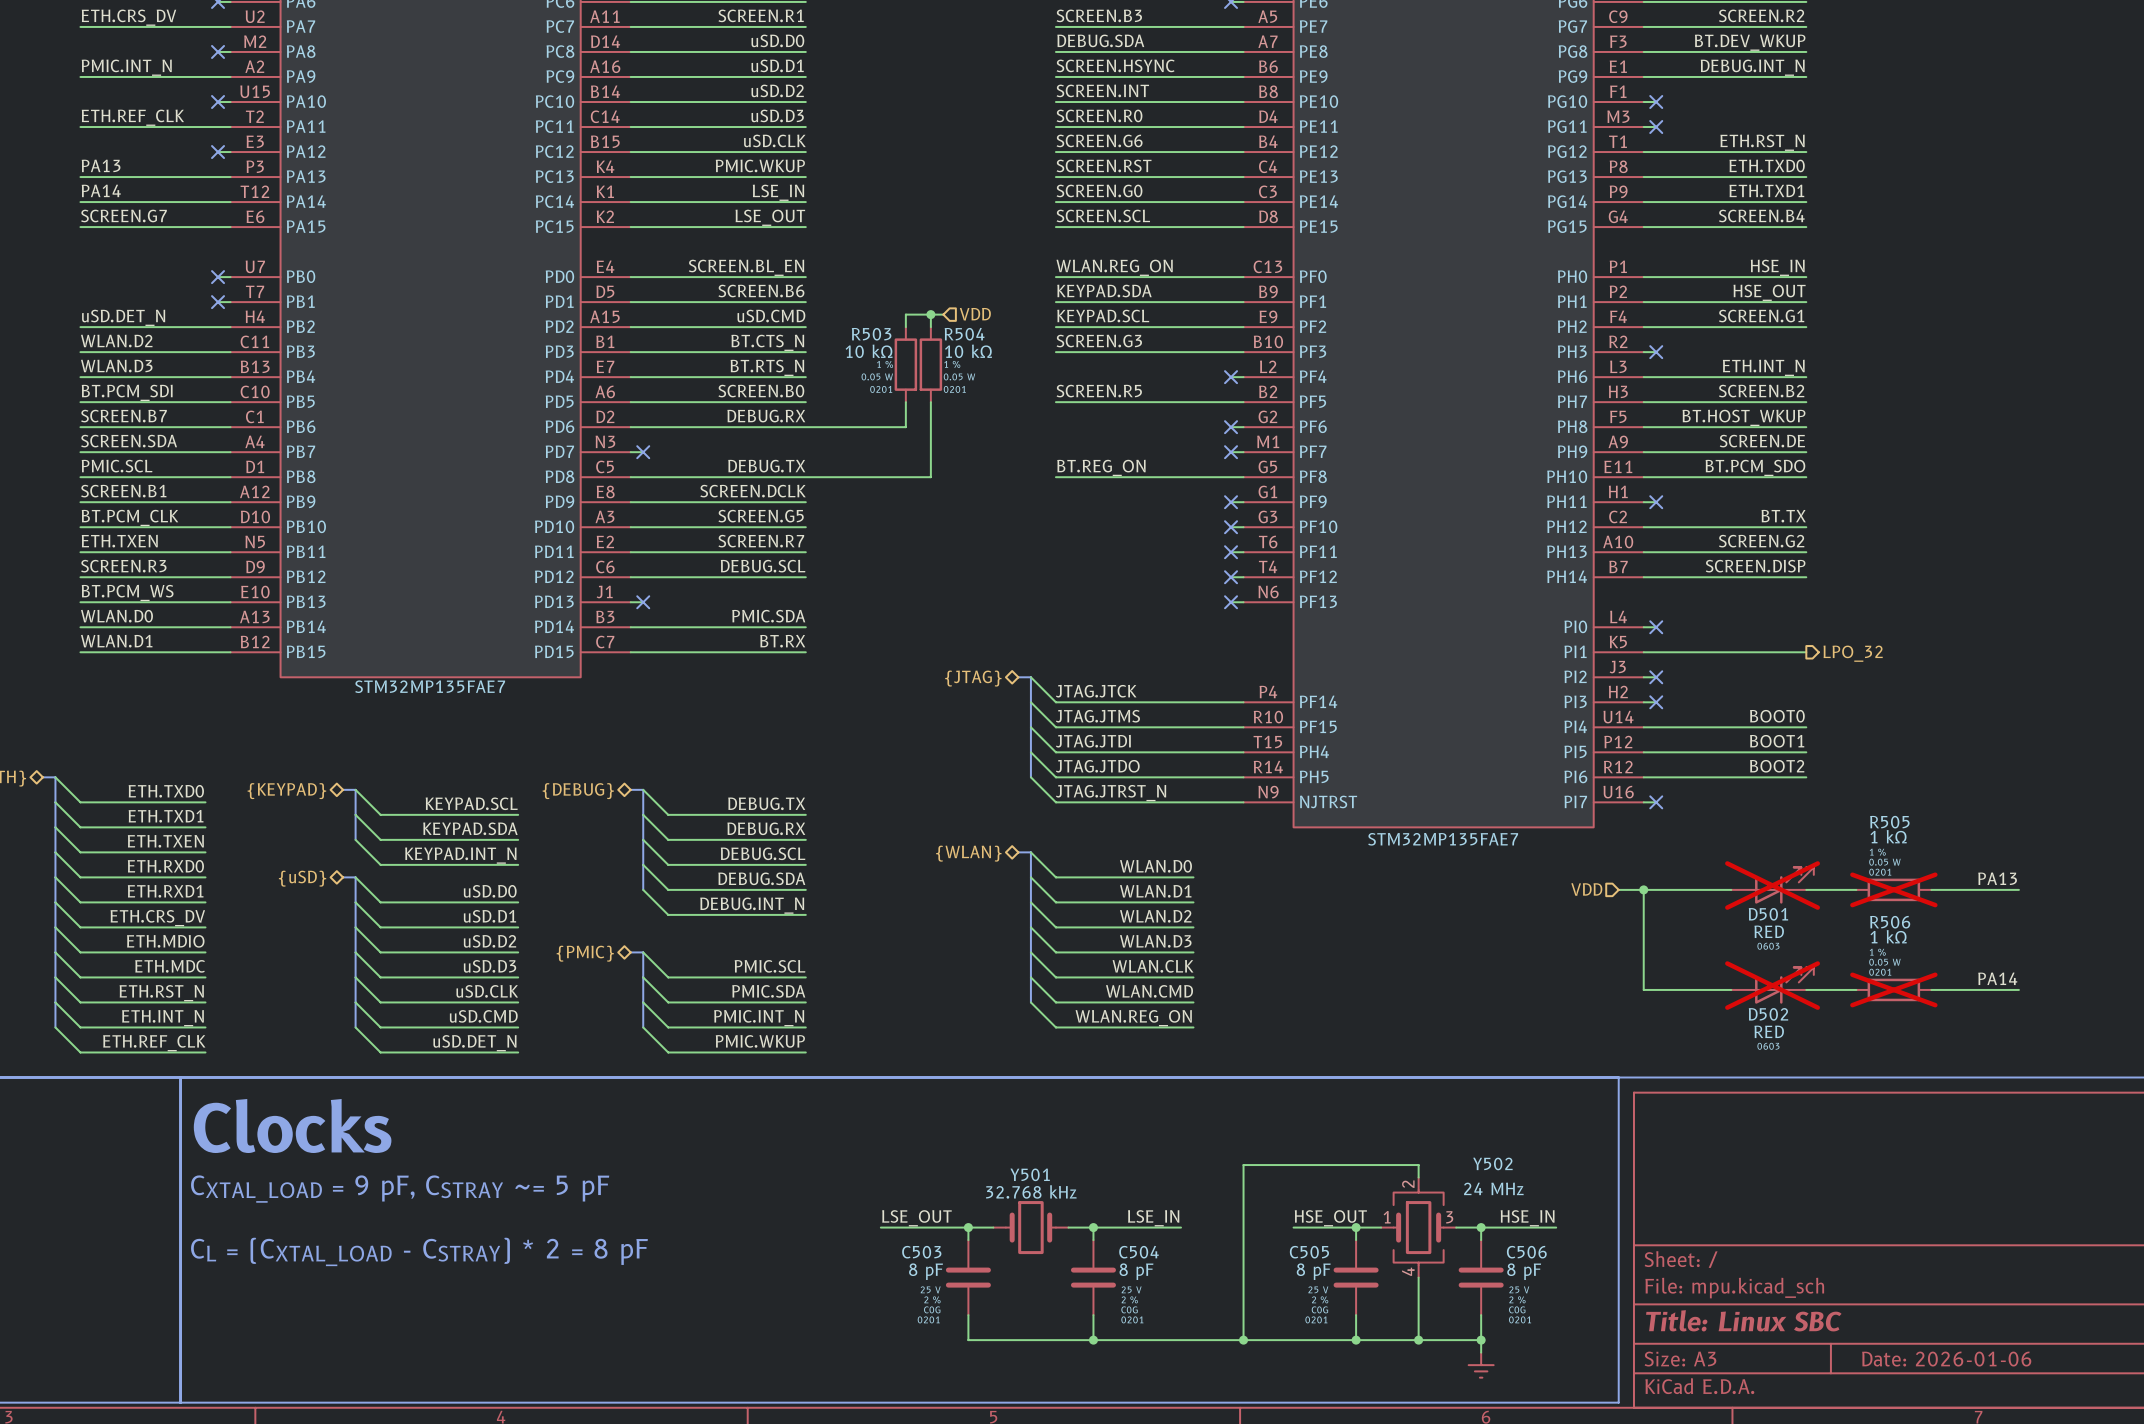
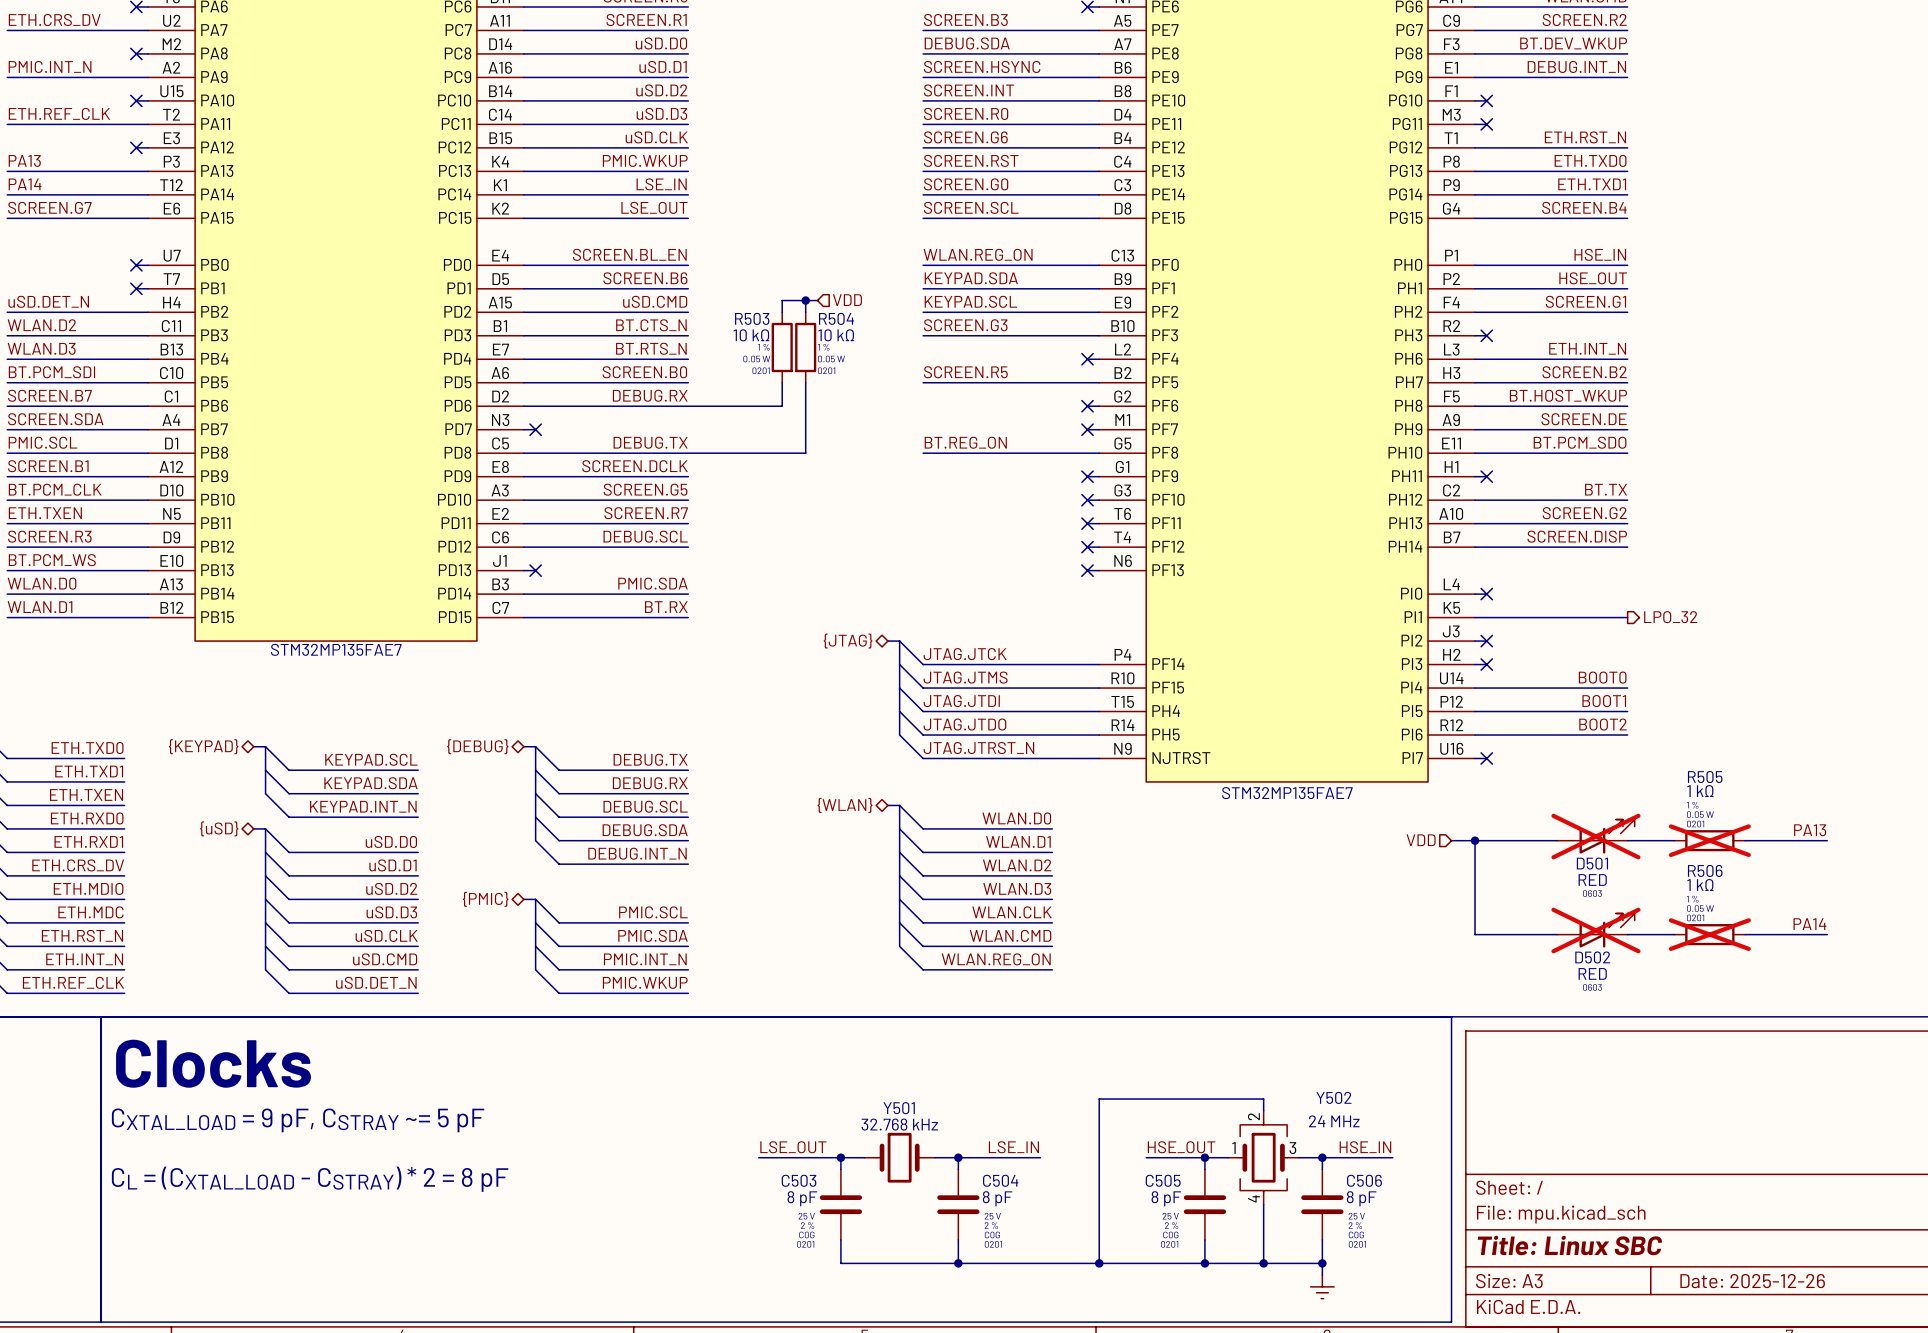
title block: Date: 2026-01-06 (1946, 1359) -> Date: 2025-12-26 (1752, 1281)

